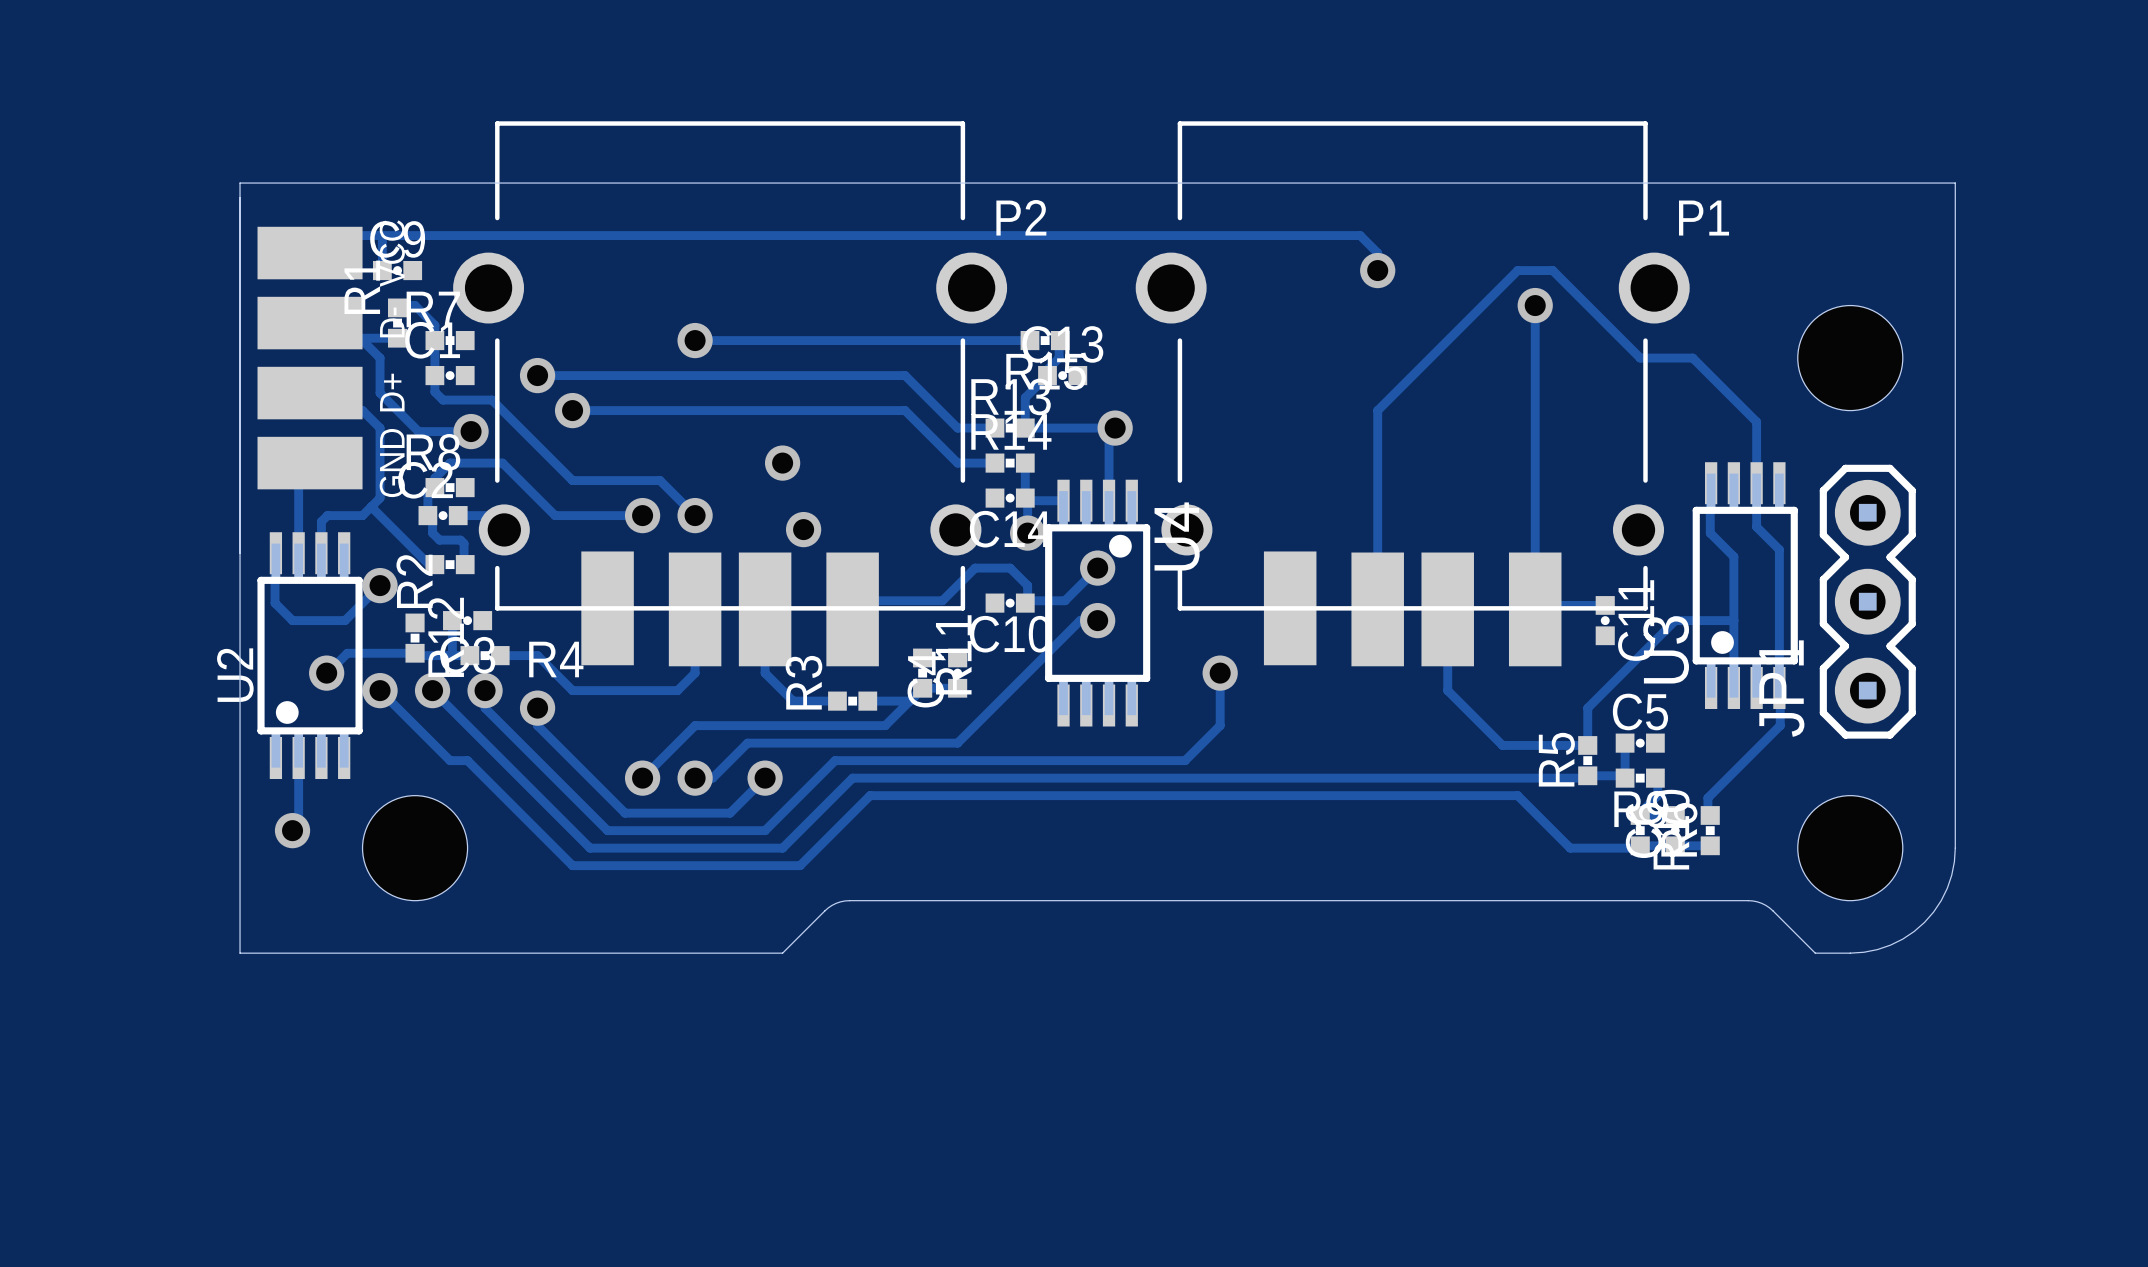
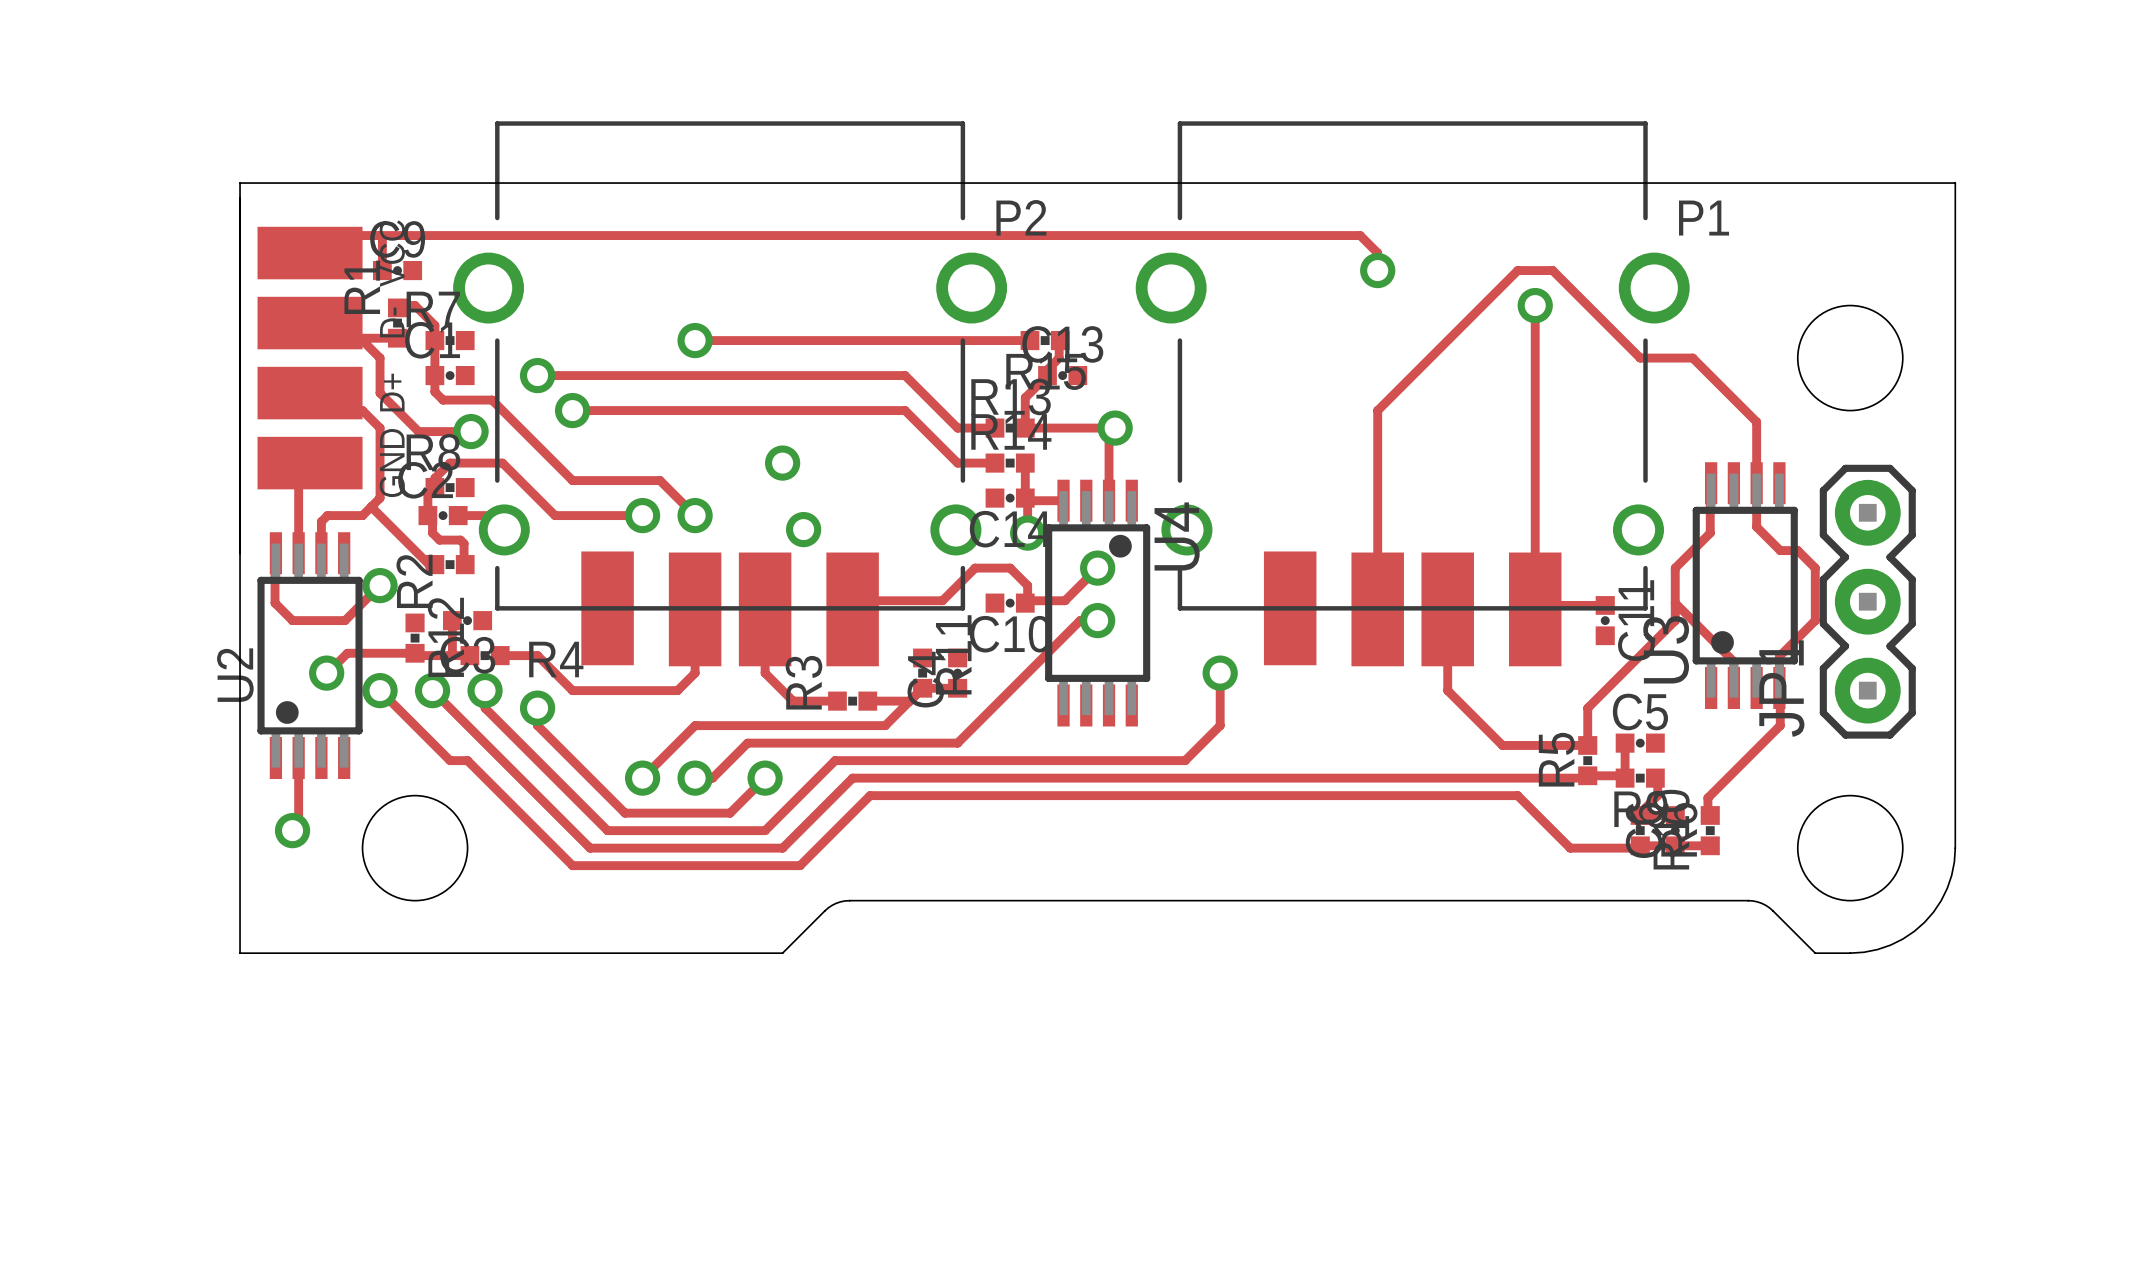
track: (1710, 533) (1733, 556) (1733, 661) -> (1710, 533) (1675, 568) (1675, 620)
track: (1779, 549) (1779, 656) -> (1779, 549) (1797, 550) (1815, 568) (1815, 620) (1779, 656)
track: none -> (1675, 603) (1733, 661)
track: (1675, 620) (1733, 620) -> none

